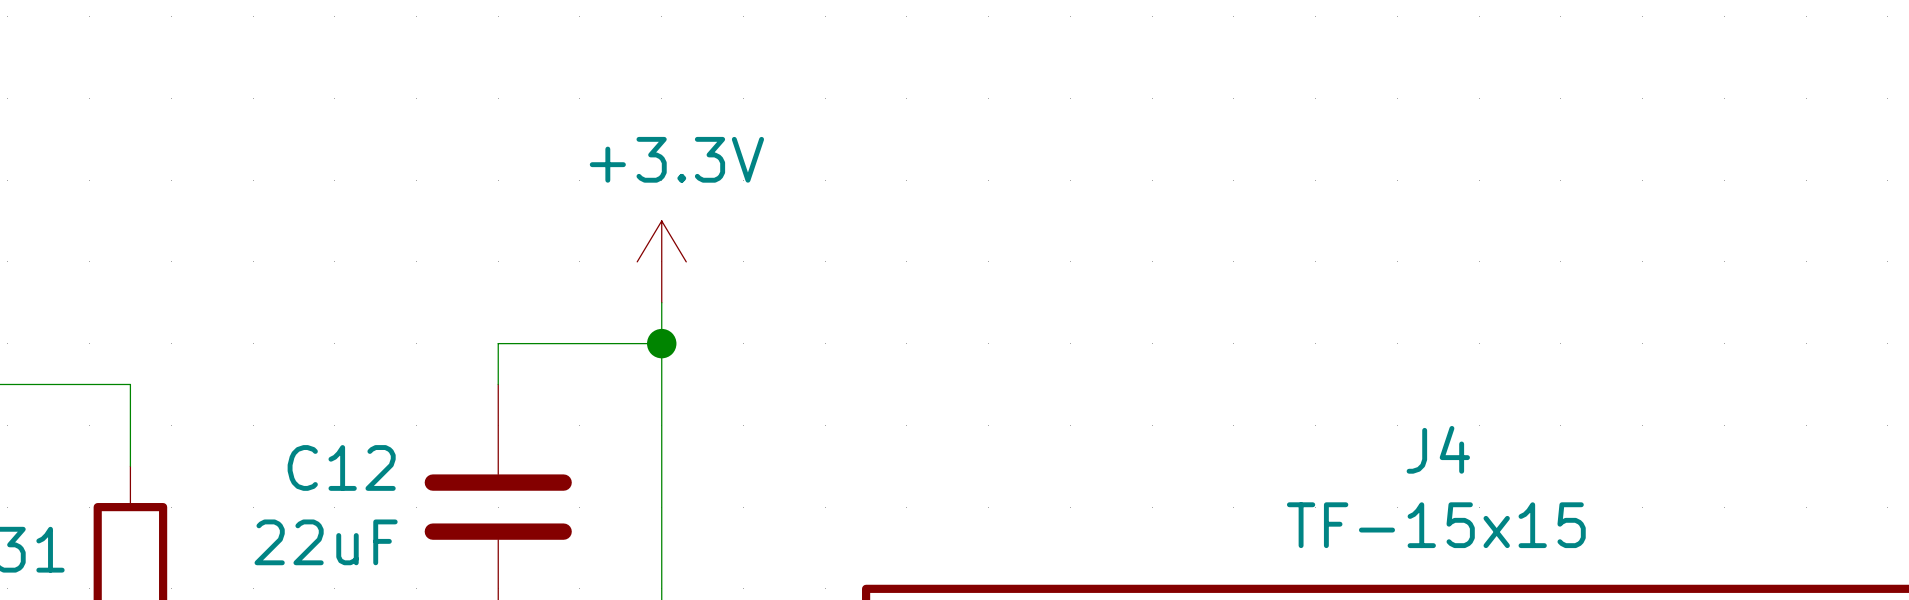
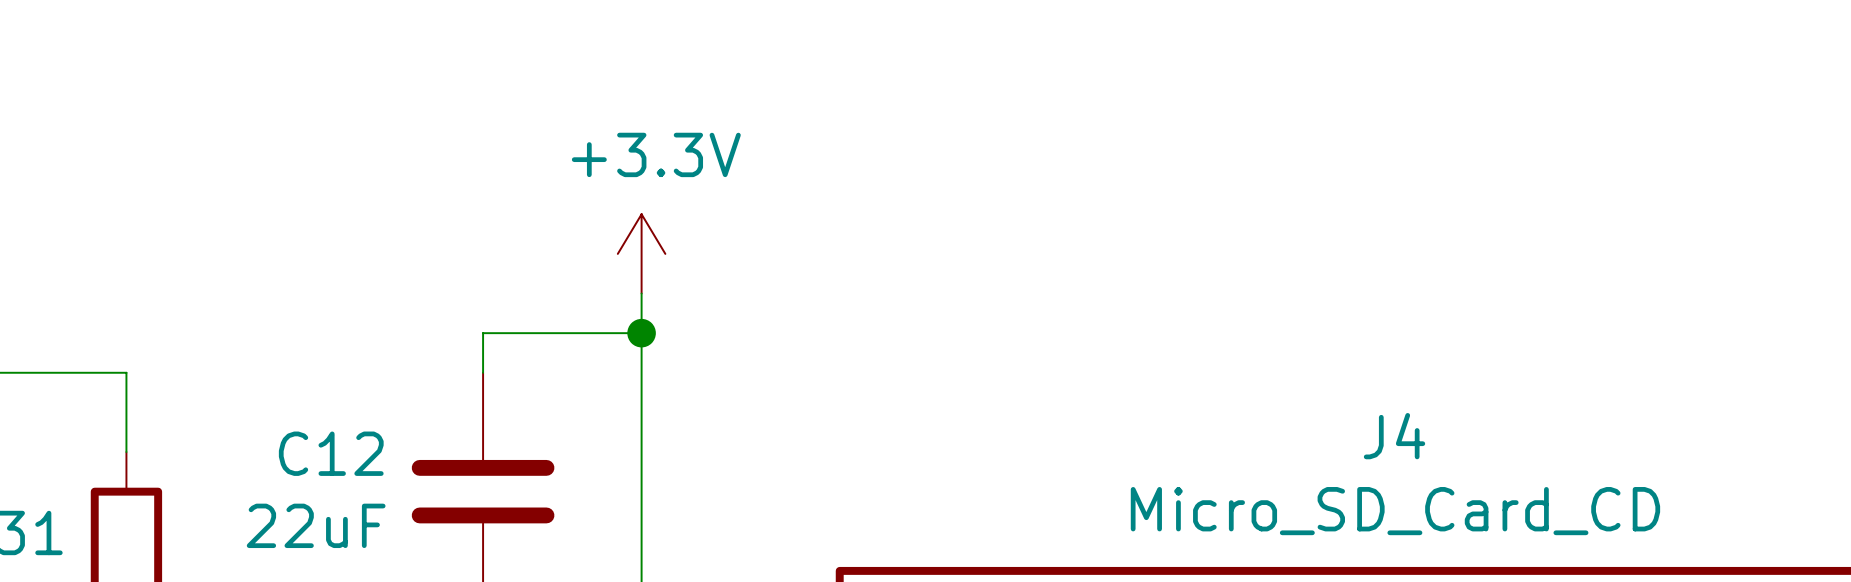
J4 value: TF-15x15 (1436, 525) -> Micro_SD_Card_CD (1395, 511)

